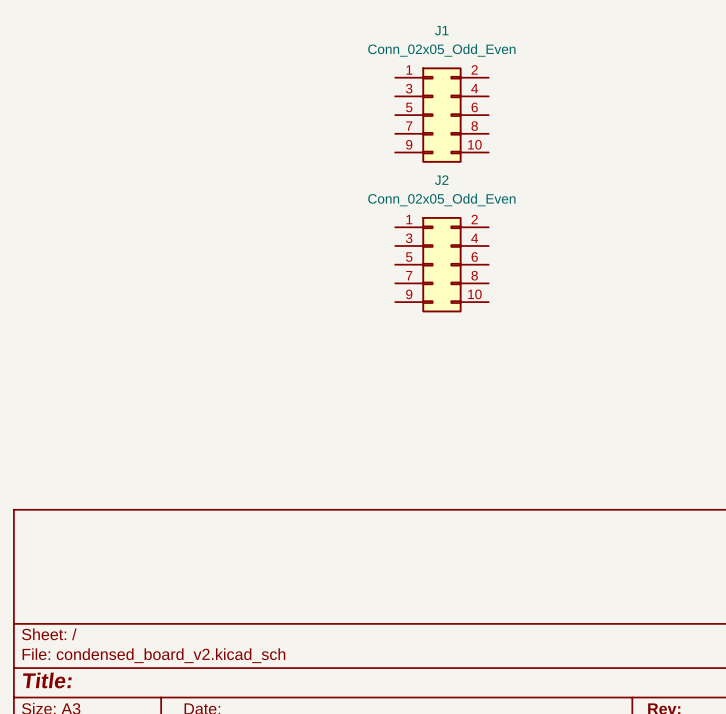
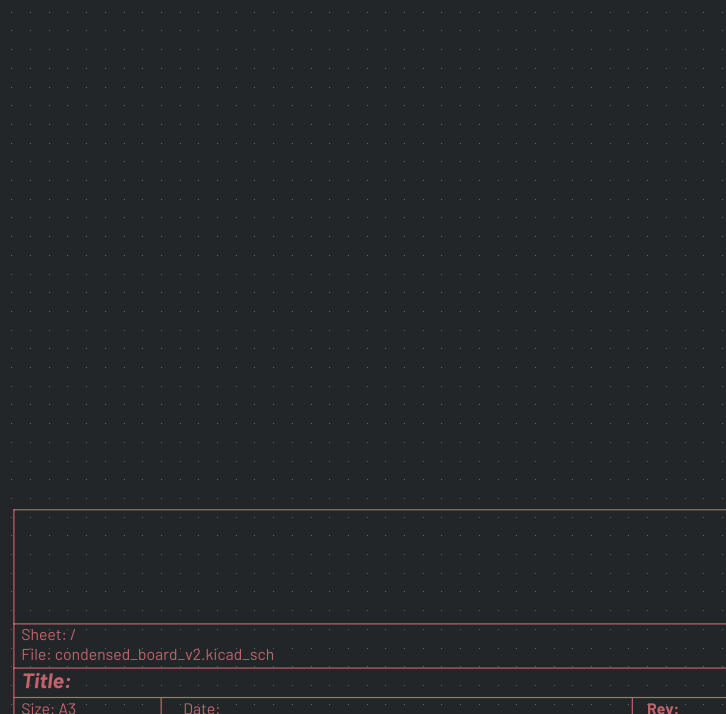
J1: Conn_02x05_Odd_Even (441, 115) -> none
J2: Conn_02x05_Odd_Even (441, 264) -> none

